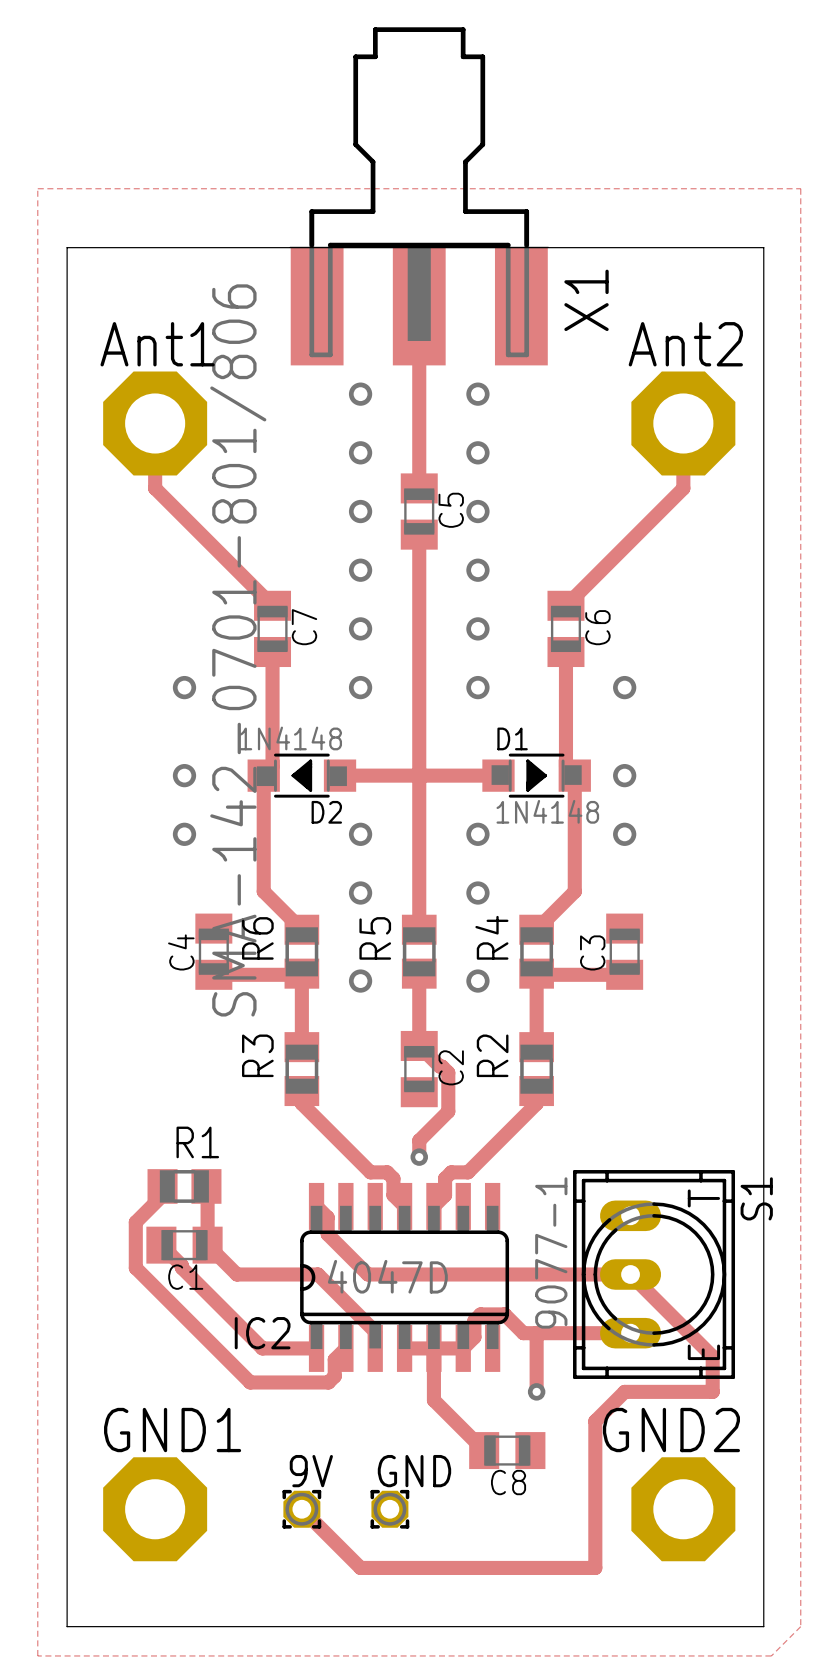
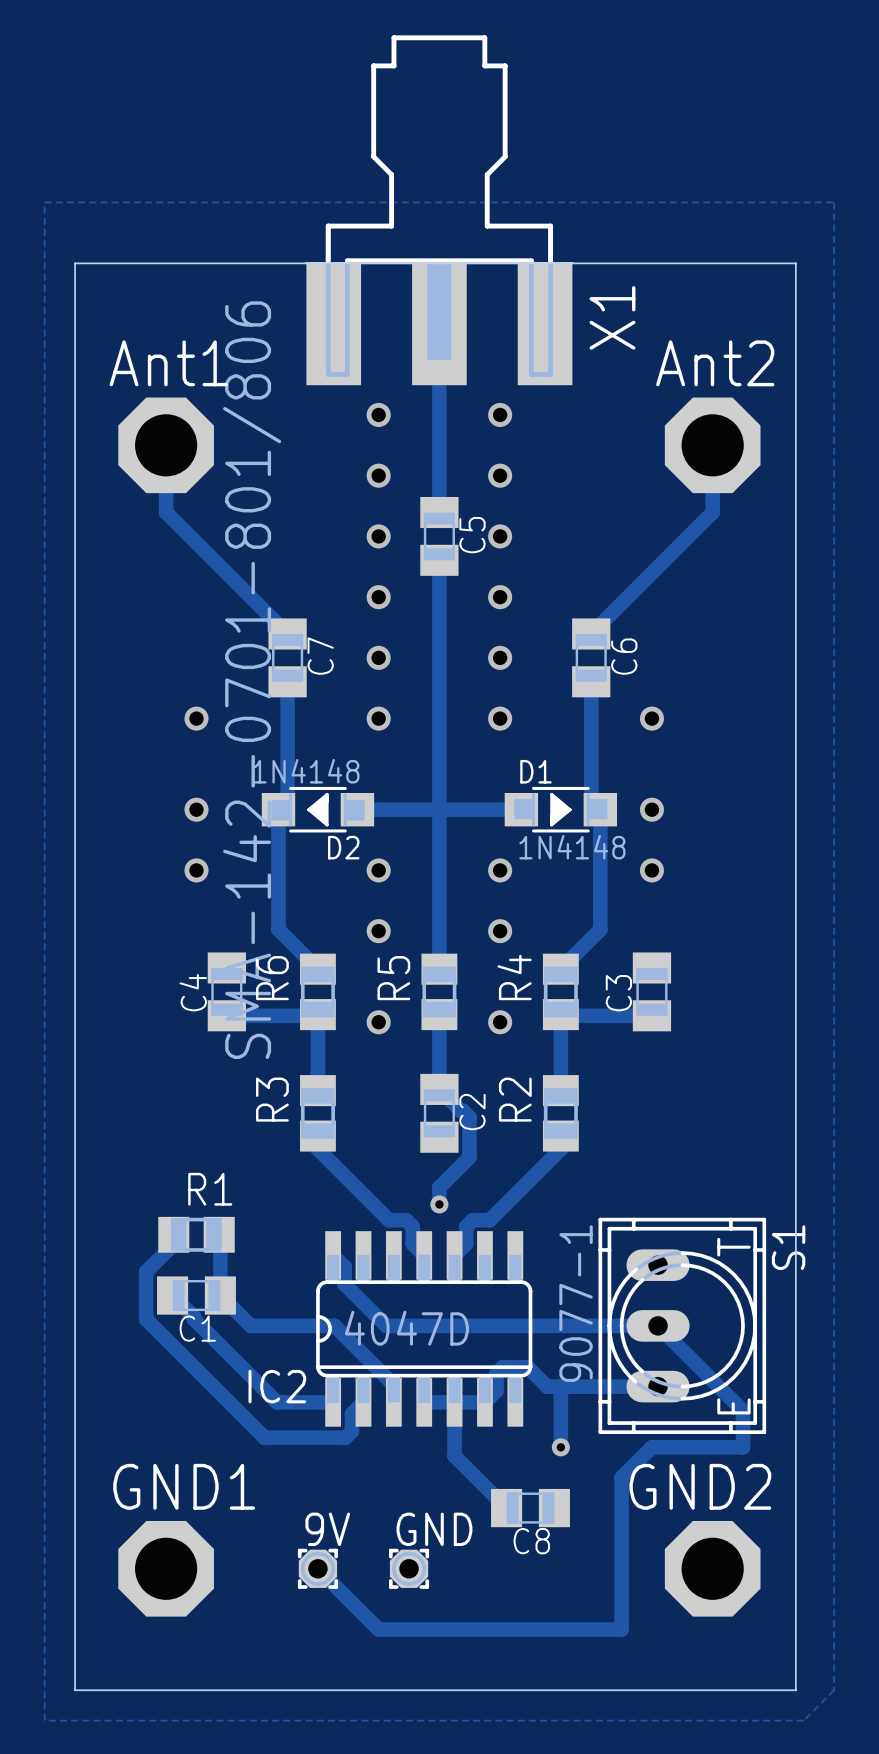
part footprint: [103, 371, 208, 476] -> [118, 397, 214, 494]
part footprint: [631, 371, 736, 476] -> [664, 397, 761, 494]
part footprint: [103, 1457, 208, 1562] -> [118, 1520, 214, 1617]
part footprint: [631, 1457, 736, 1562] -> [664, 1520, 761, 1617]

